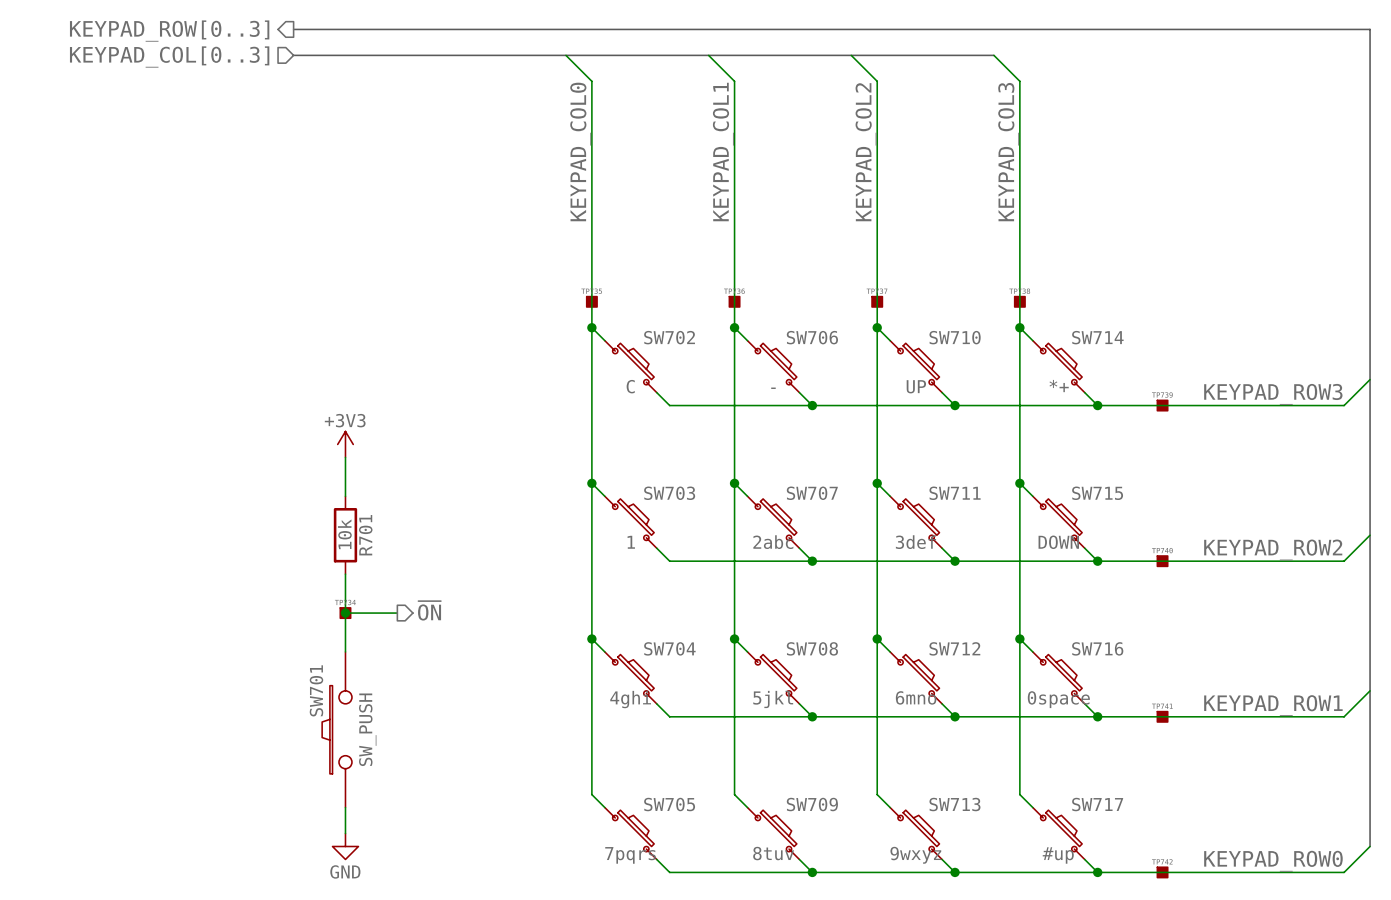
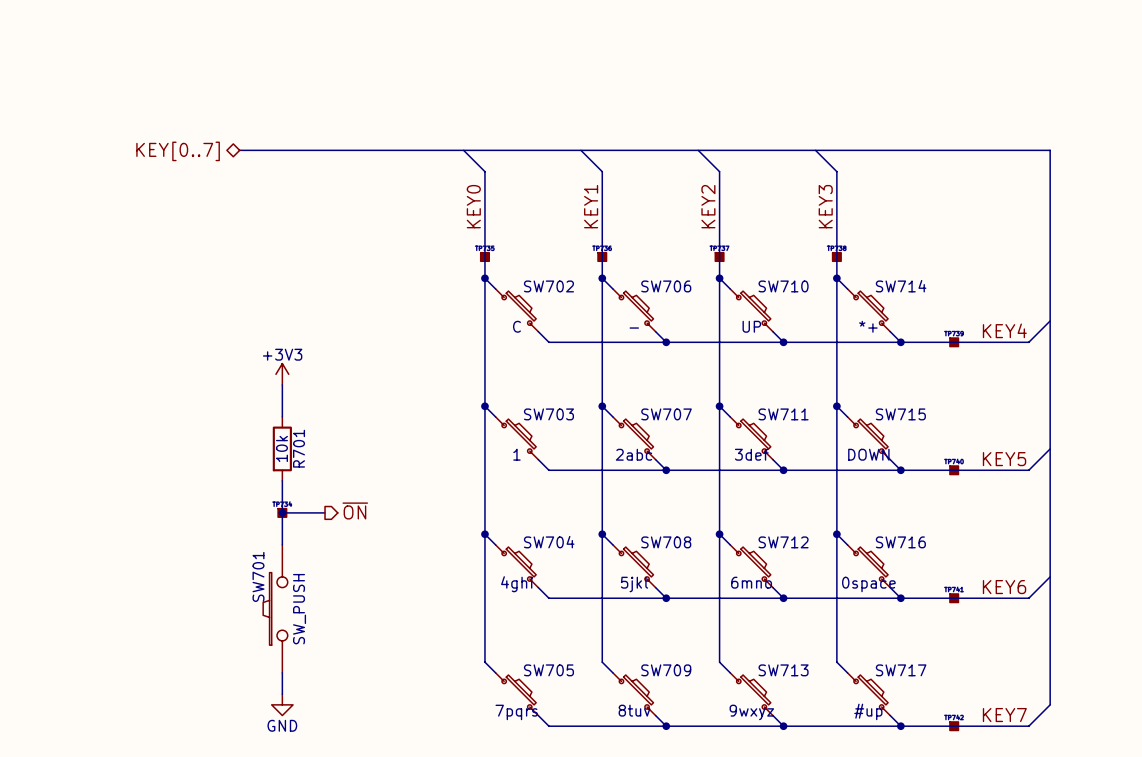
bus: (293, 29) (1370, 29) (1370, 846) -> none
hierarchical label: KEYPAD_ROW[0..3] (169, 31) -> none
bus: (293, 55) (993, 55) -> none
wire: (565, 55) (591, 81) (591, 198) -> (463, 150) (484, 171)
wire: (708, 55) (734, 81) (734, 198) -> (580, 150) (602, 171)
wire: (851, 55) (877, 81) (877, 198) -> (698, 150) (719, 171)
wire: (993, 55) (1019, 81) (1019, 198) -> (815, 150) (836, 171)
hierarchical label: KEYPAD_COL[0..3] (169, 56) -> none
label: KEYPAD_COL0 (580, 151) -> none
label: KEYPAD_COL1 (723, 152) -> none
label: KEYPAD_COL2 (866, 152) -> none
label: KEYPAD_COL3 (1008, 152) -> none
hierarchical label: none -> KEY[0..7] (178, 151)
bus: none -> (239, 150) (1050, 150) (1050, 704)
label: none -> KEY0 (473, 206)
label: none -> KEY1 (591, 206)
label: none -> KEY2 (708, 206)
label: none -> KEY3 (825, 206)
wire: (1370, 379) (1344, 405) (1253, 405) -> (1050, 320) (1028, 342)
label: none -> KEY4 (1004, 330)
label: KEYPAD_ROW3 (1273, 394) -> none
wire: (1370, 535) (1344, 561) (1253, 561) -> (1050, 448) (1028, 470)
label: none -> KEY5 (1004, 459)
label: KEYPAD_ROW2 (1273, 549) -> none
wire: (1370, 690) (1344, 716) (1253, 716) -> (1050, 576) (1028, 598)
label: none -> KEY6 (1004, 587)
label: KEYPAD_ROW1 (1273, 705) -> none
wire: (1370, 846) (1344, 872) (1253, 872) -> (1050, 704) (1028, 726)
label: none -> KEY7 (1004, 715)
label: KEYPAD_ROW0 (1273, 861) -> none

